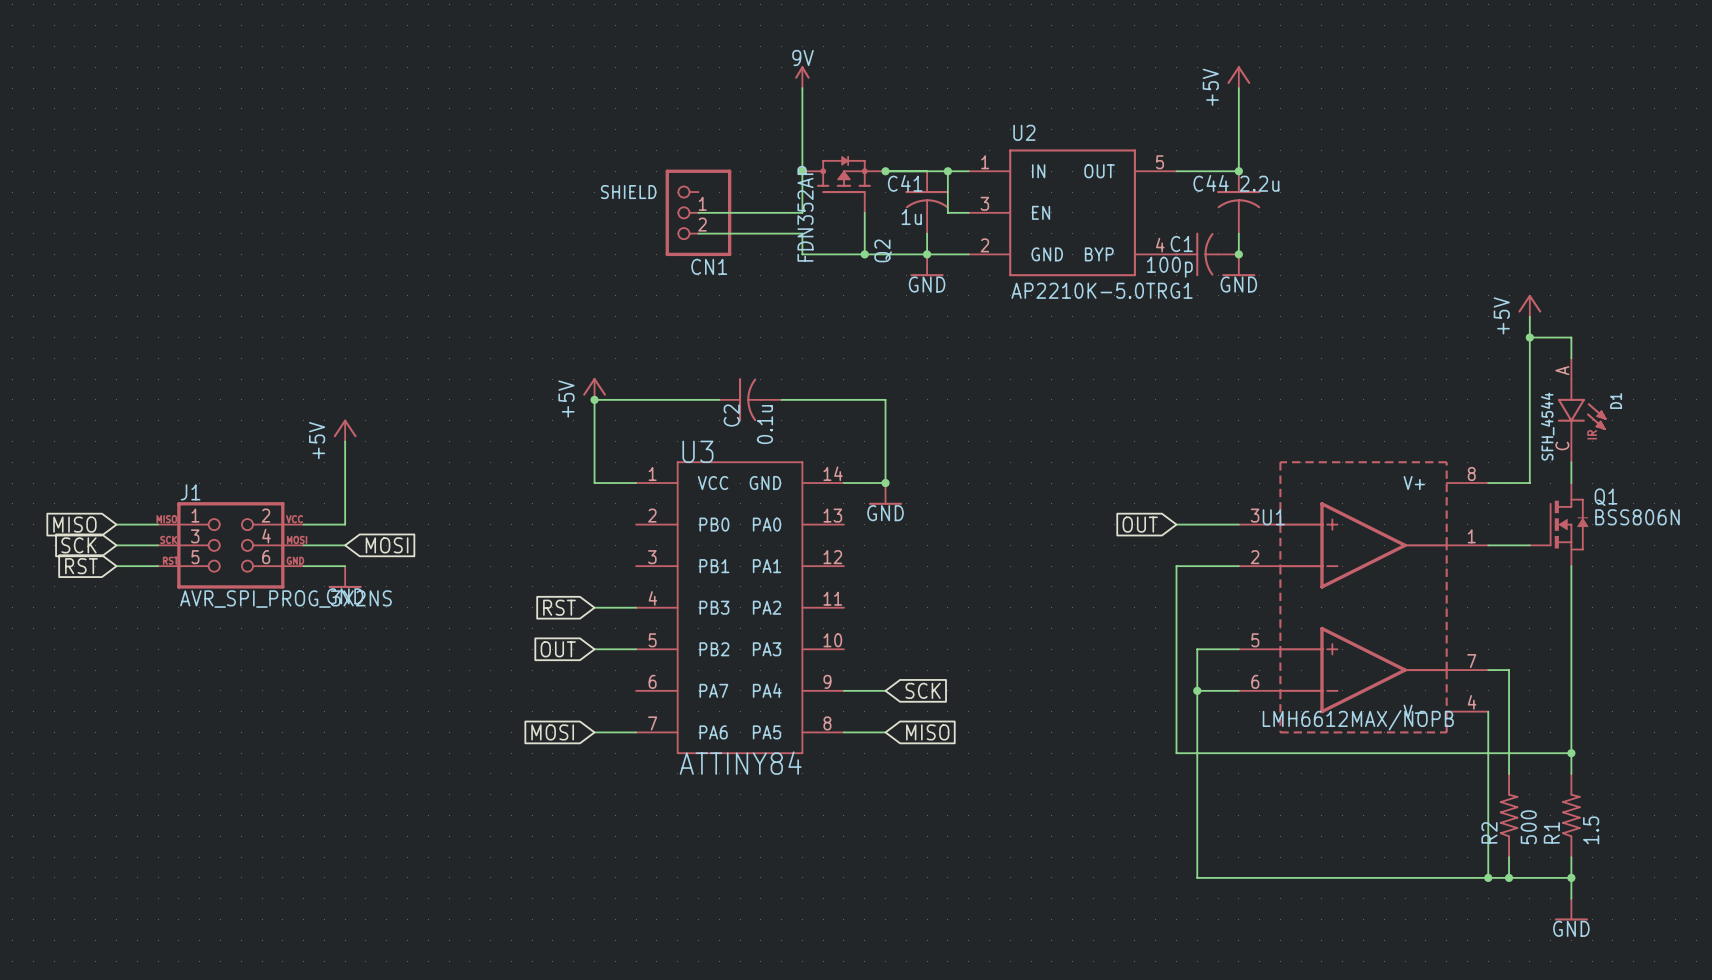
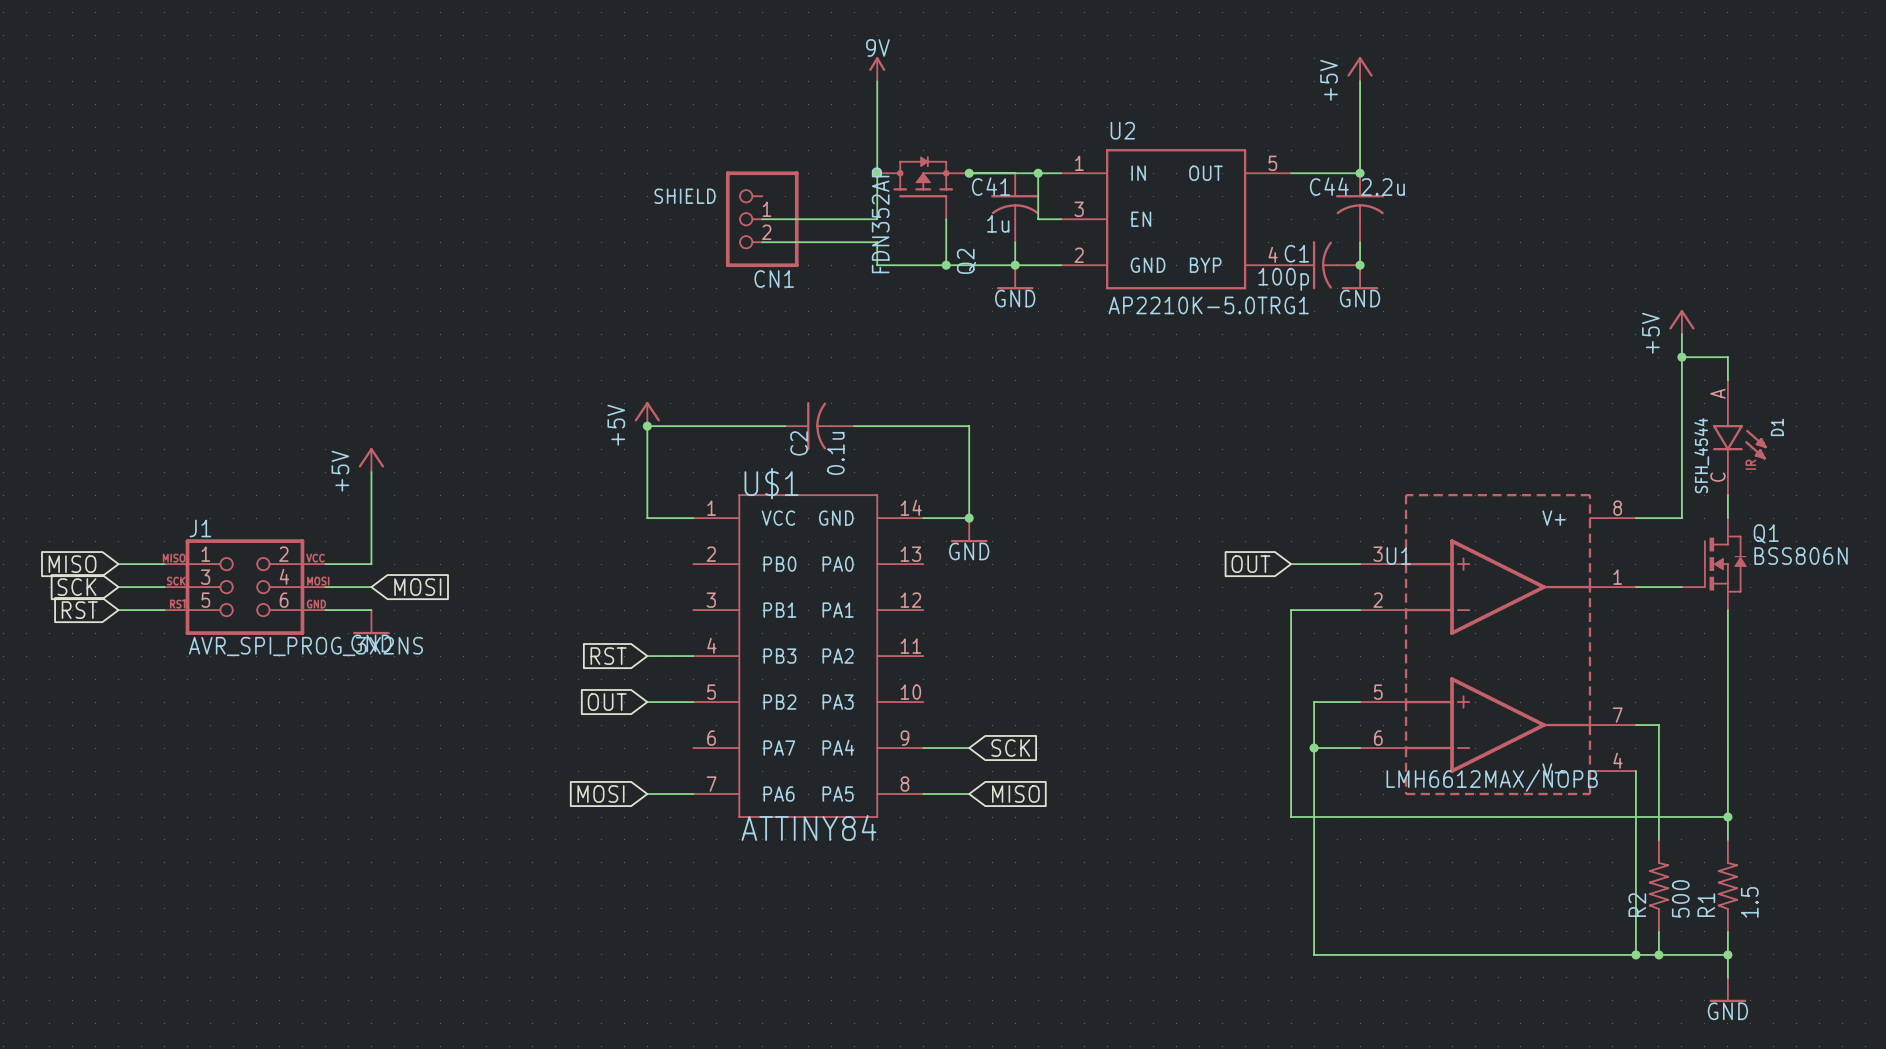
U3 name: U3 (697, 451) -> U$1 (771, 483)

